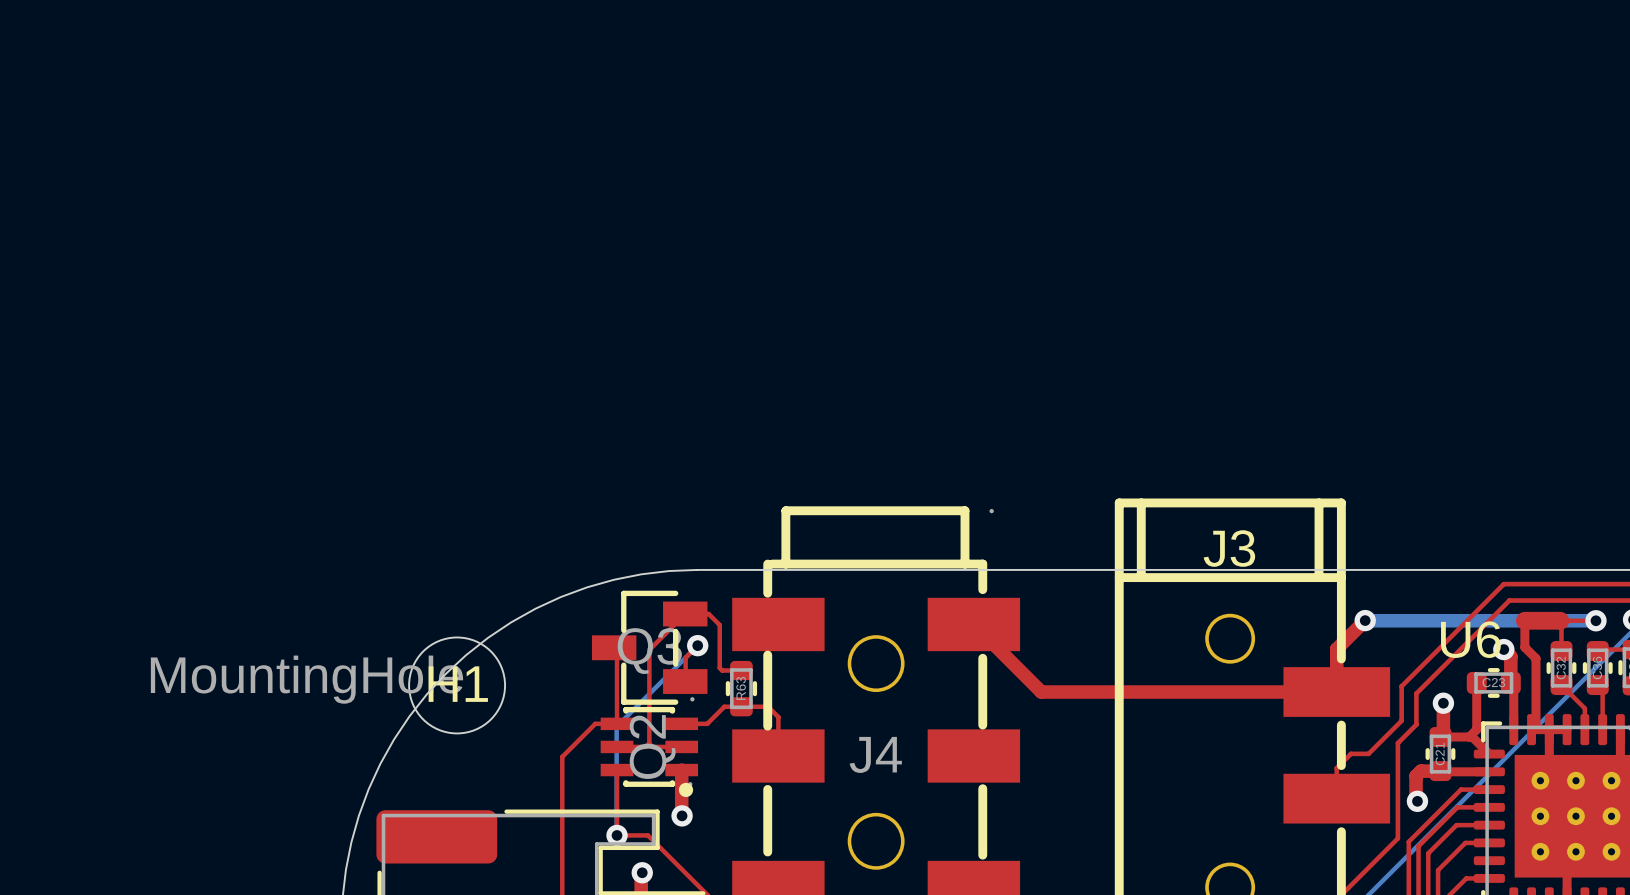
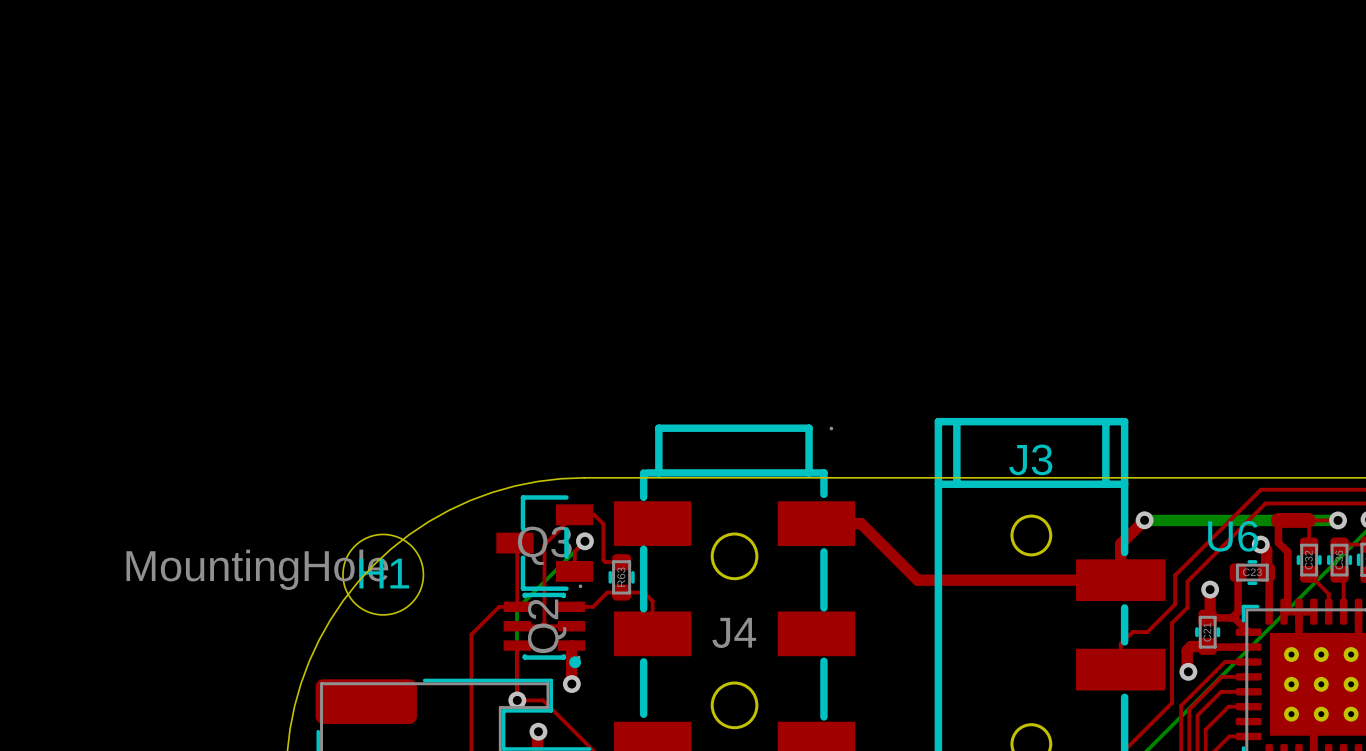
top track: (973, 624) (1041, 692) (1094, 692) -> (816, 523) (861, 523) (917, 580)

